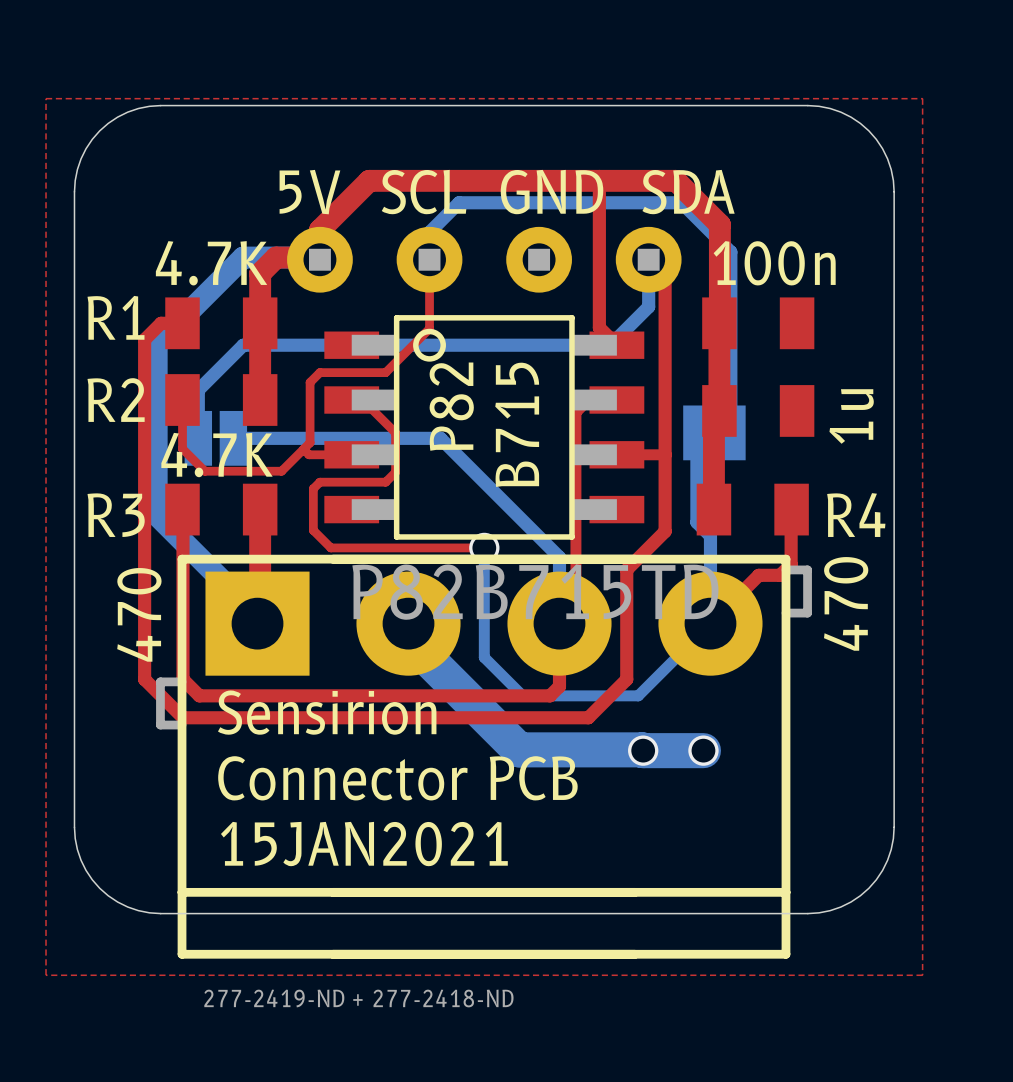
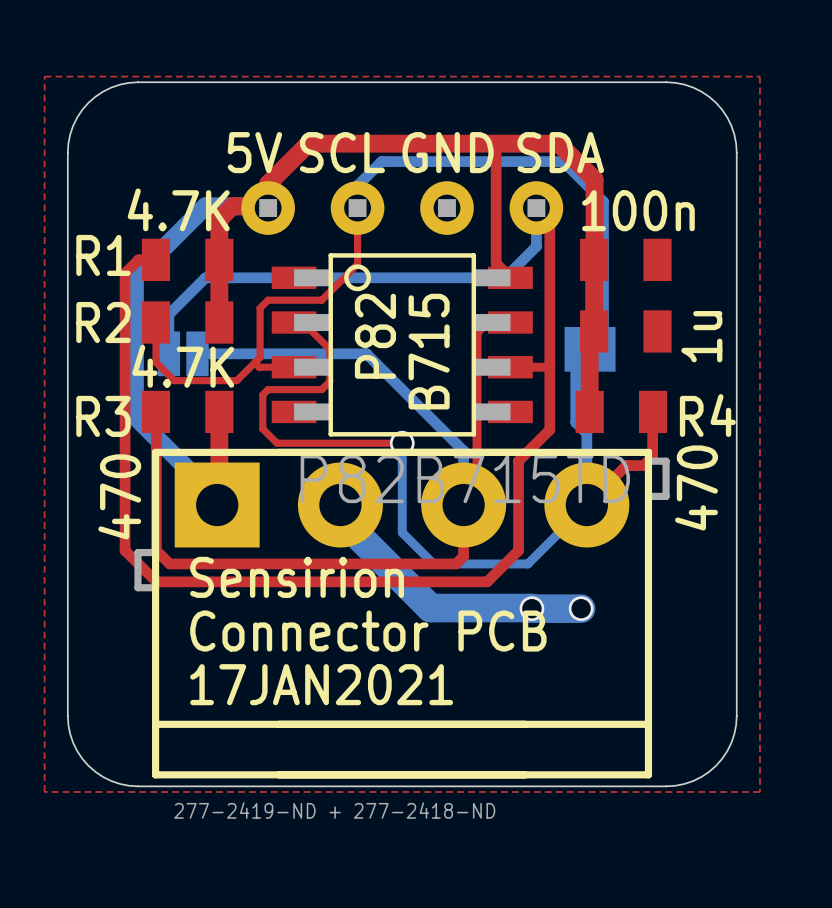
board edge: (74, 827) (81, 860) (99, 888) (127, 907) (160, 913) (819, 912) (851, 902) (876, 879) (887, 860) (894, 827) -> (67, 671) (68, 725) (77, 751) (88, 765) (103, 776) (120, 783) (138, 786) (675, 785) (701, 776) (716, 765) (727, 751) (736, 725) (736, 671)
text: 15JAN2021 (364, 844) -> 17JAN2021 (321, 684)

